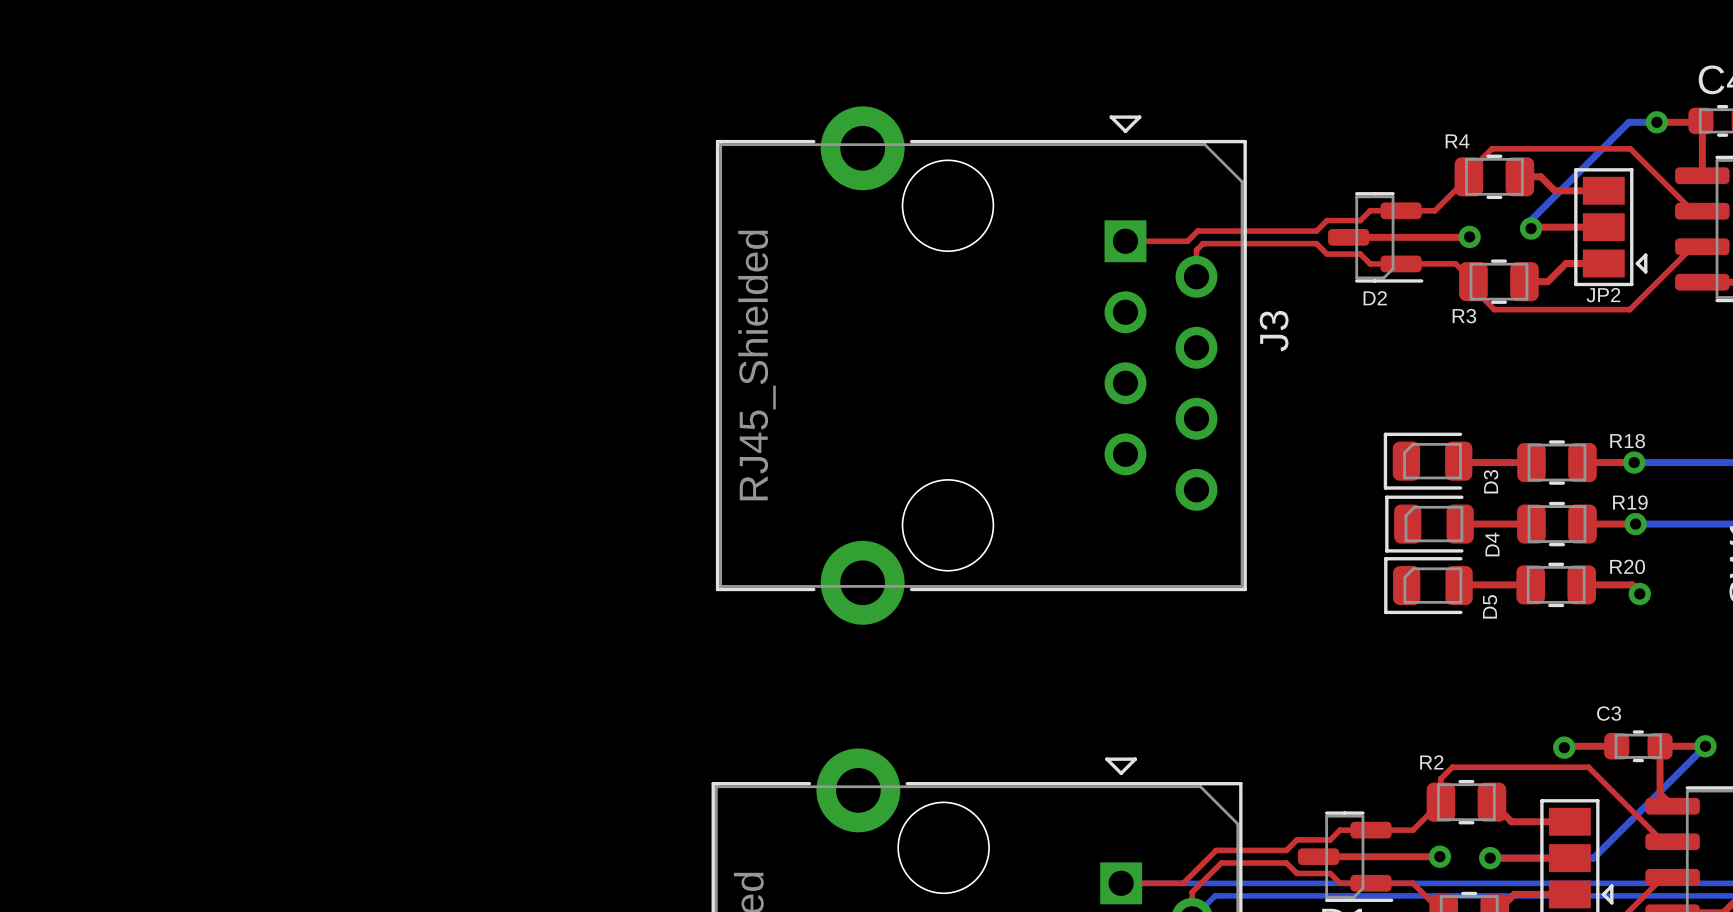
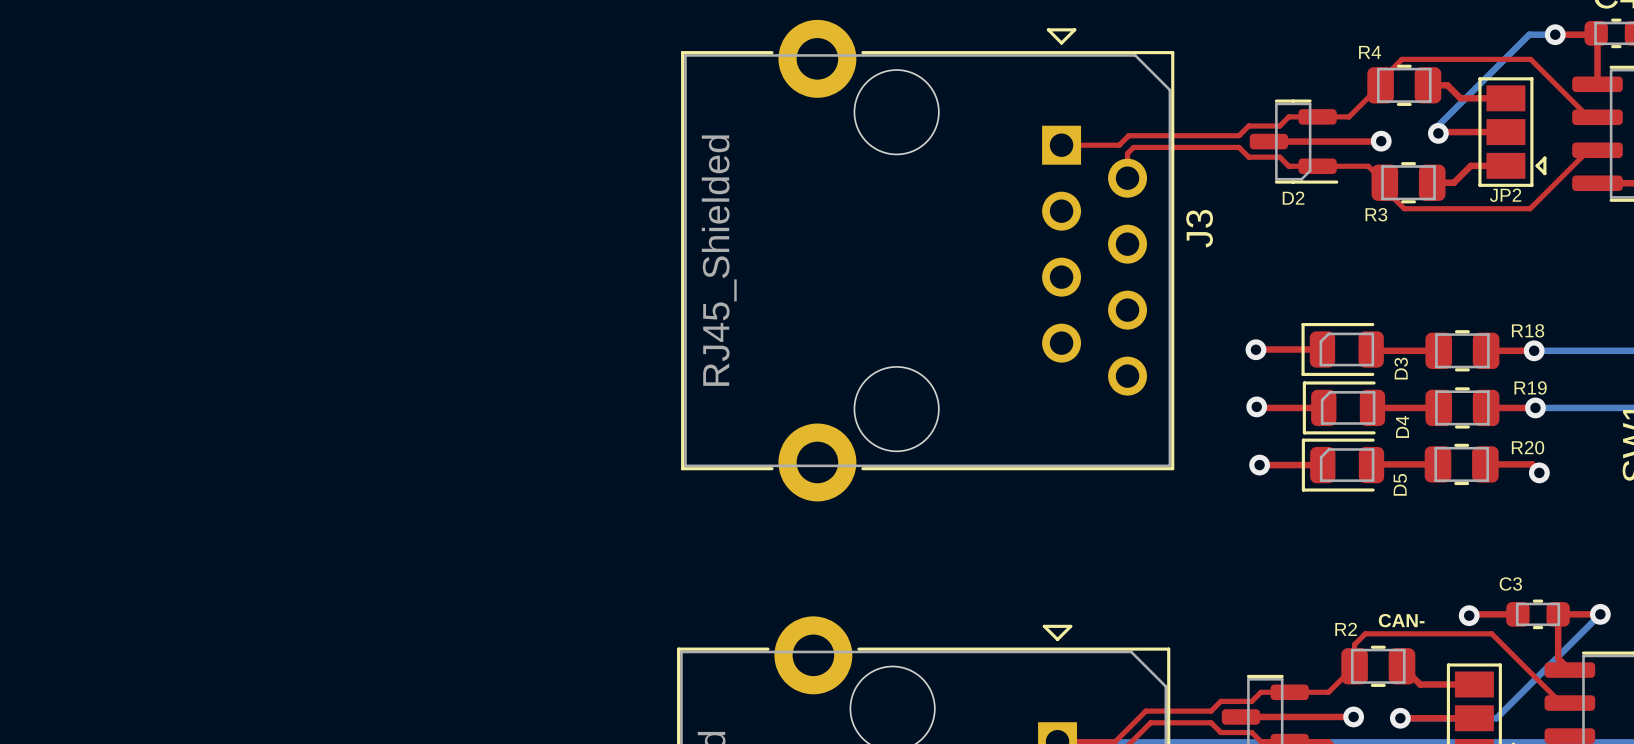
via: none -> (1255, 349)
top track: none -> (1256, 349) (1322, 349)
top track: none -> (1256, 406) (1323, 407)
via: none -> (1256, 406)
top track: none -> (1259, 465) (1322, 465)
via: none -> (1259, 465)
text: none -> CAN- (1401, 620)

